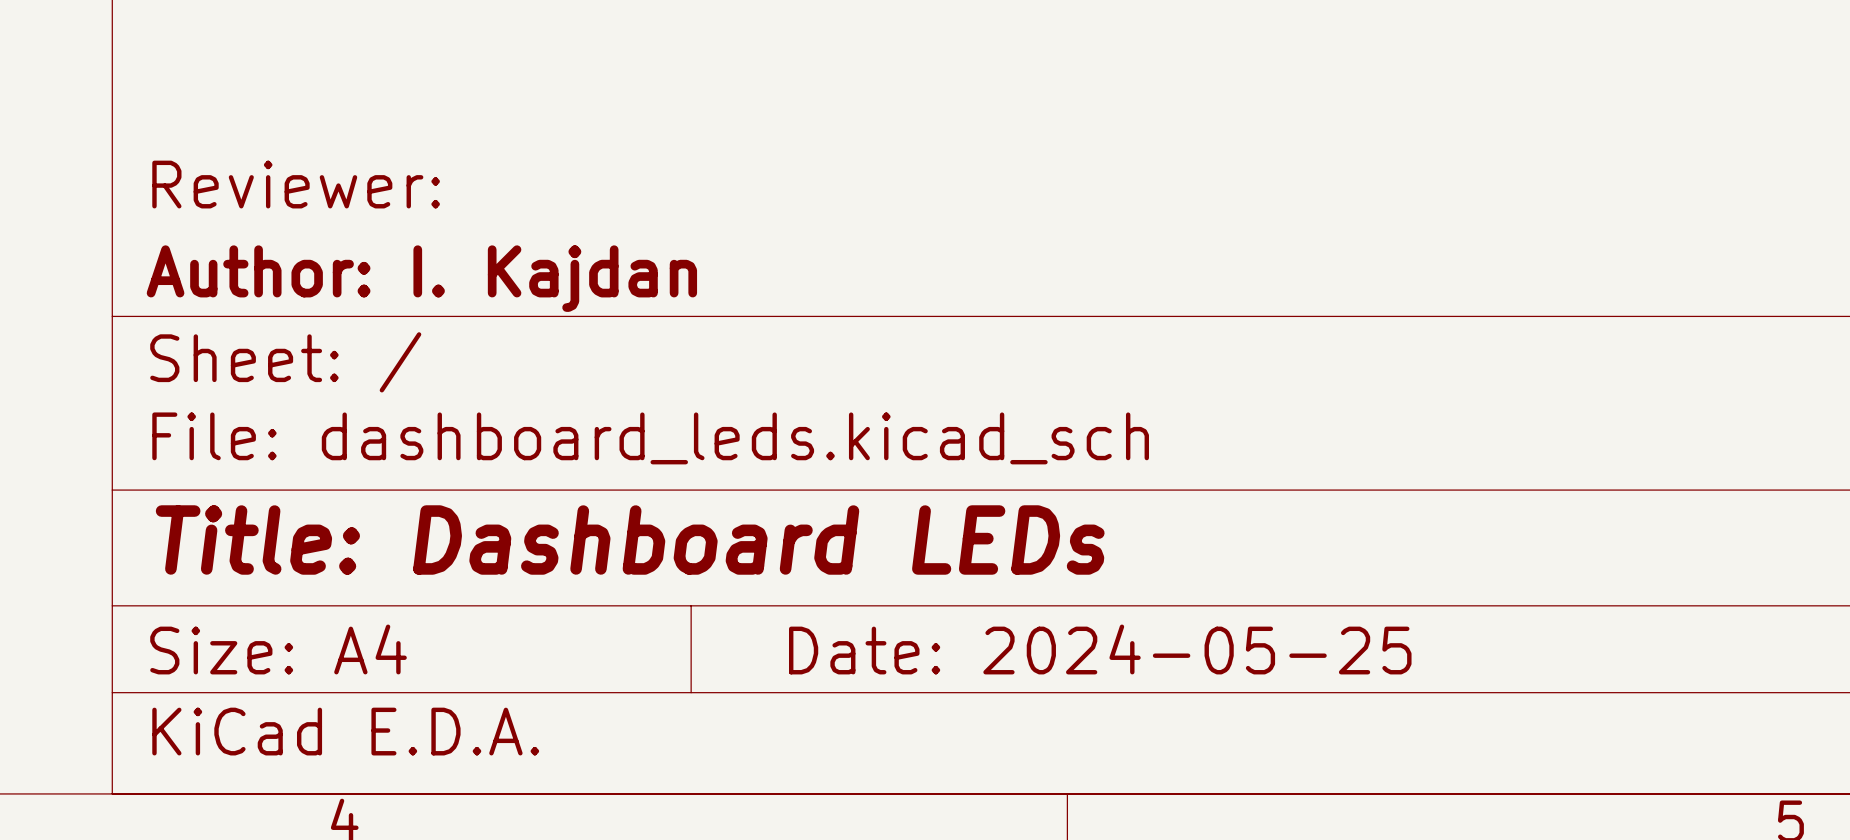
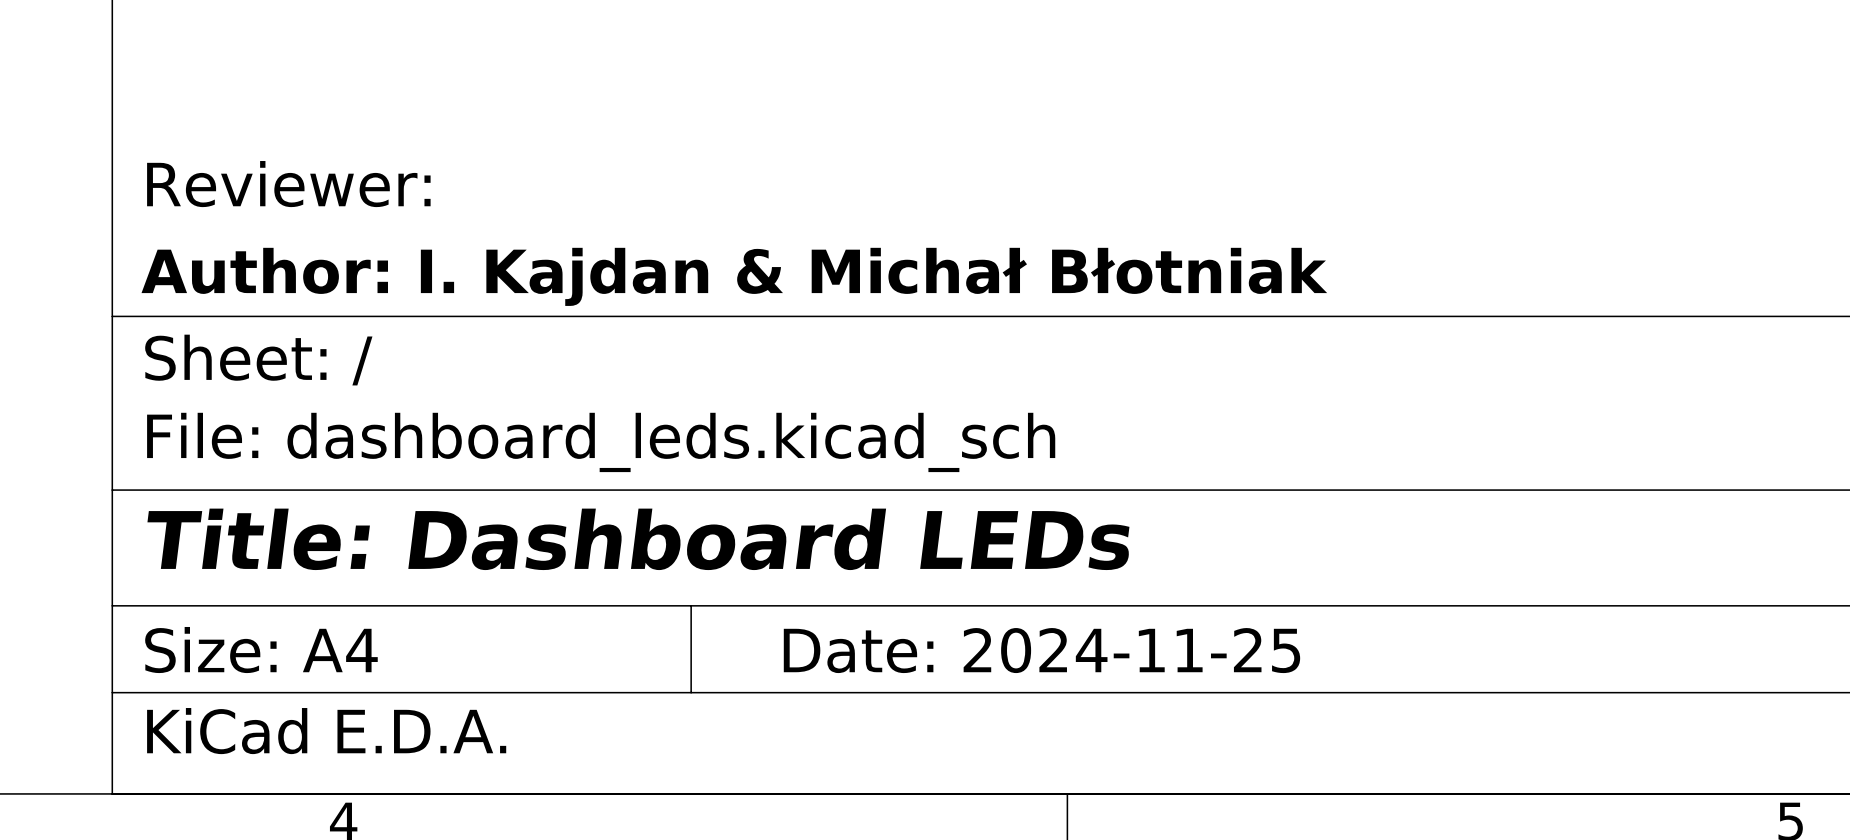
title block: Author: I. Kajdan (421, 278) -> Author: I. Kajdan & Michał Błotniak (734, 276)
title block: Date: 2024-05-25 (1100, 649) -> Date: 2024-11-25 (1041, 650)

